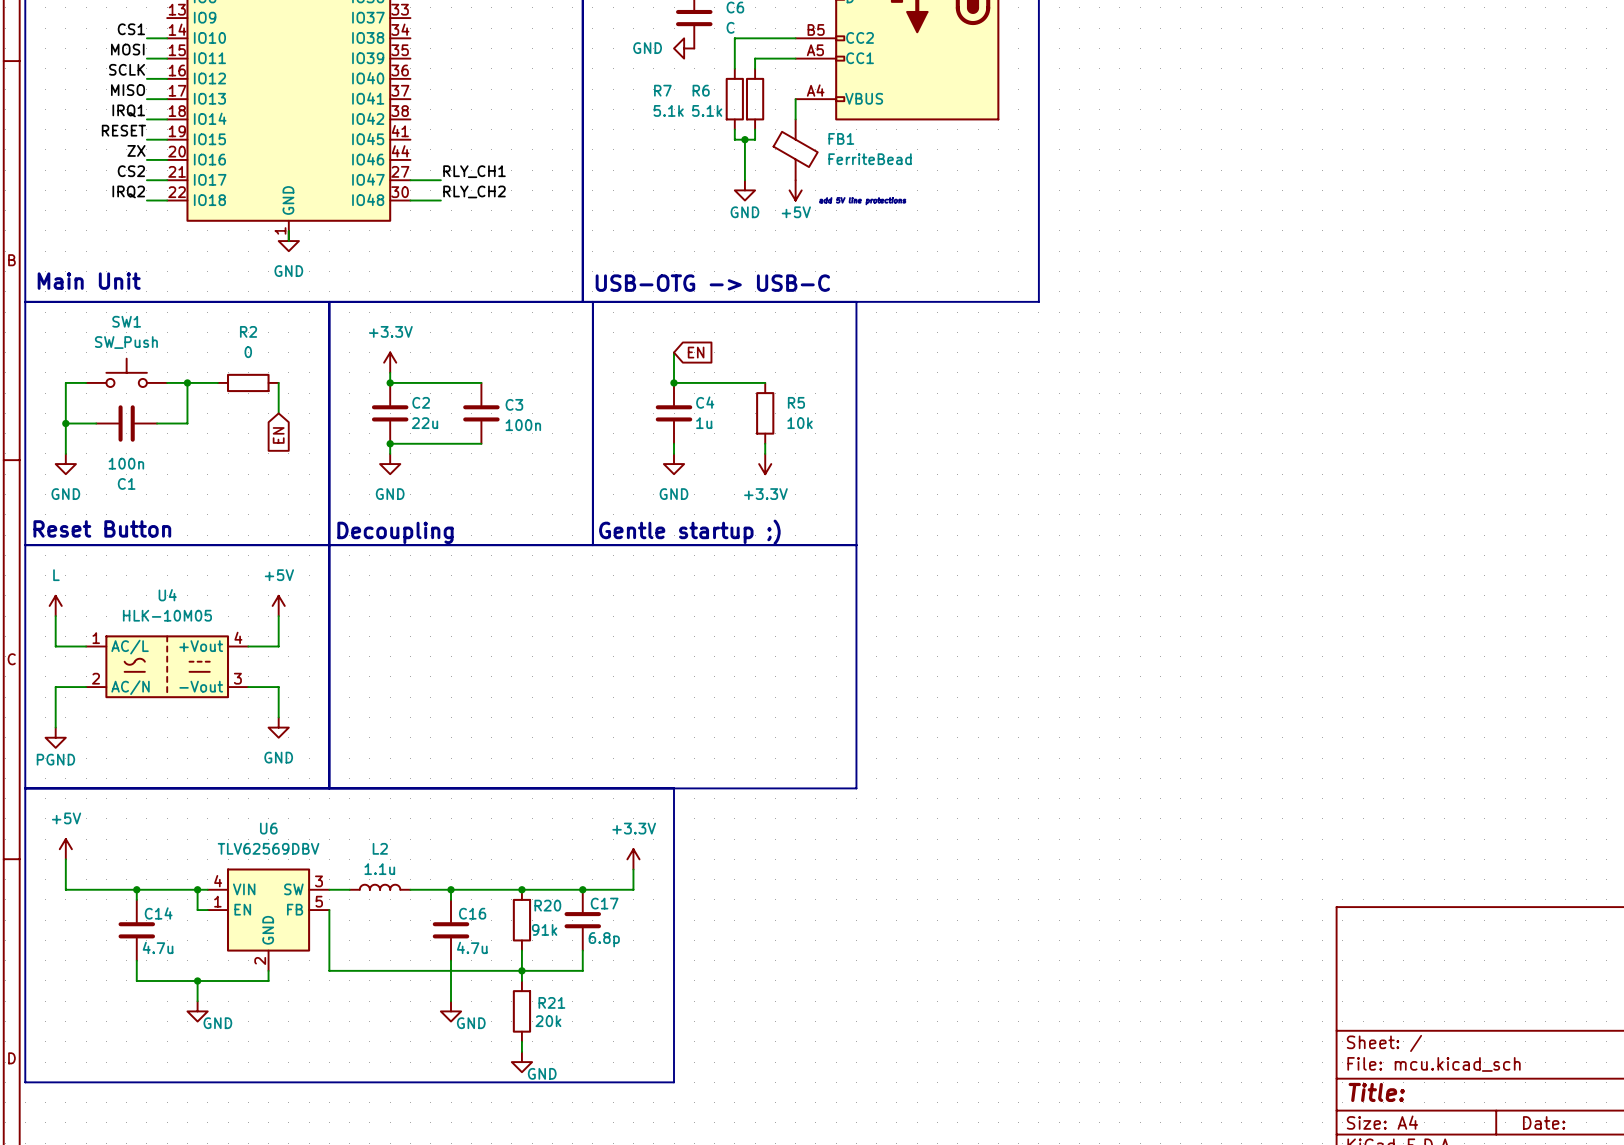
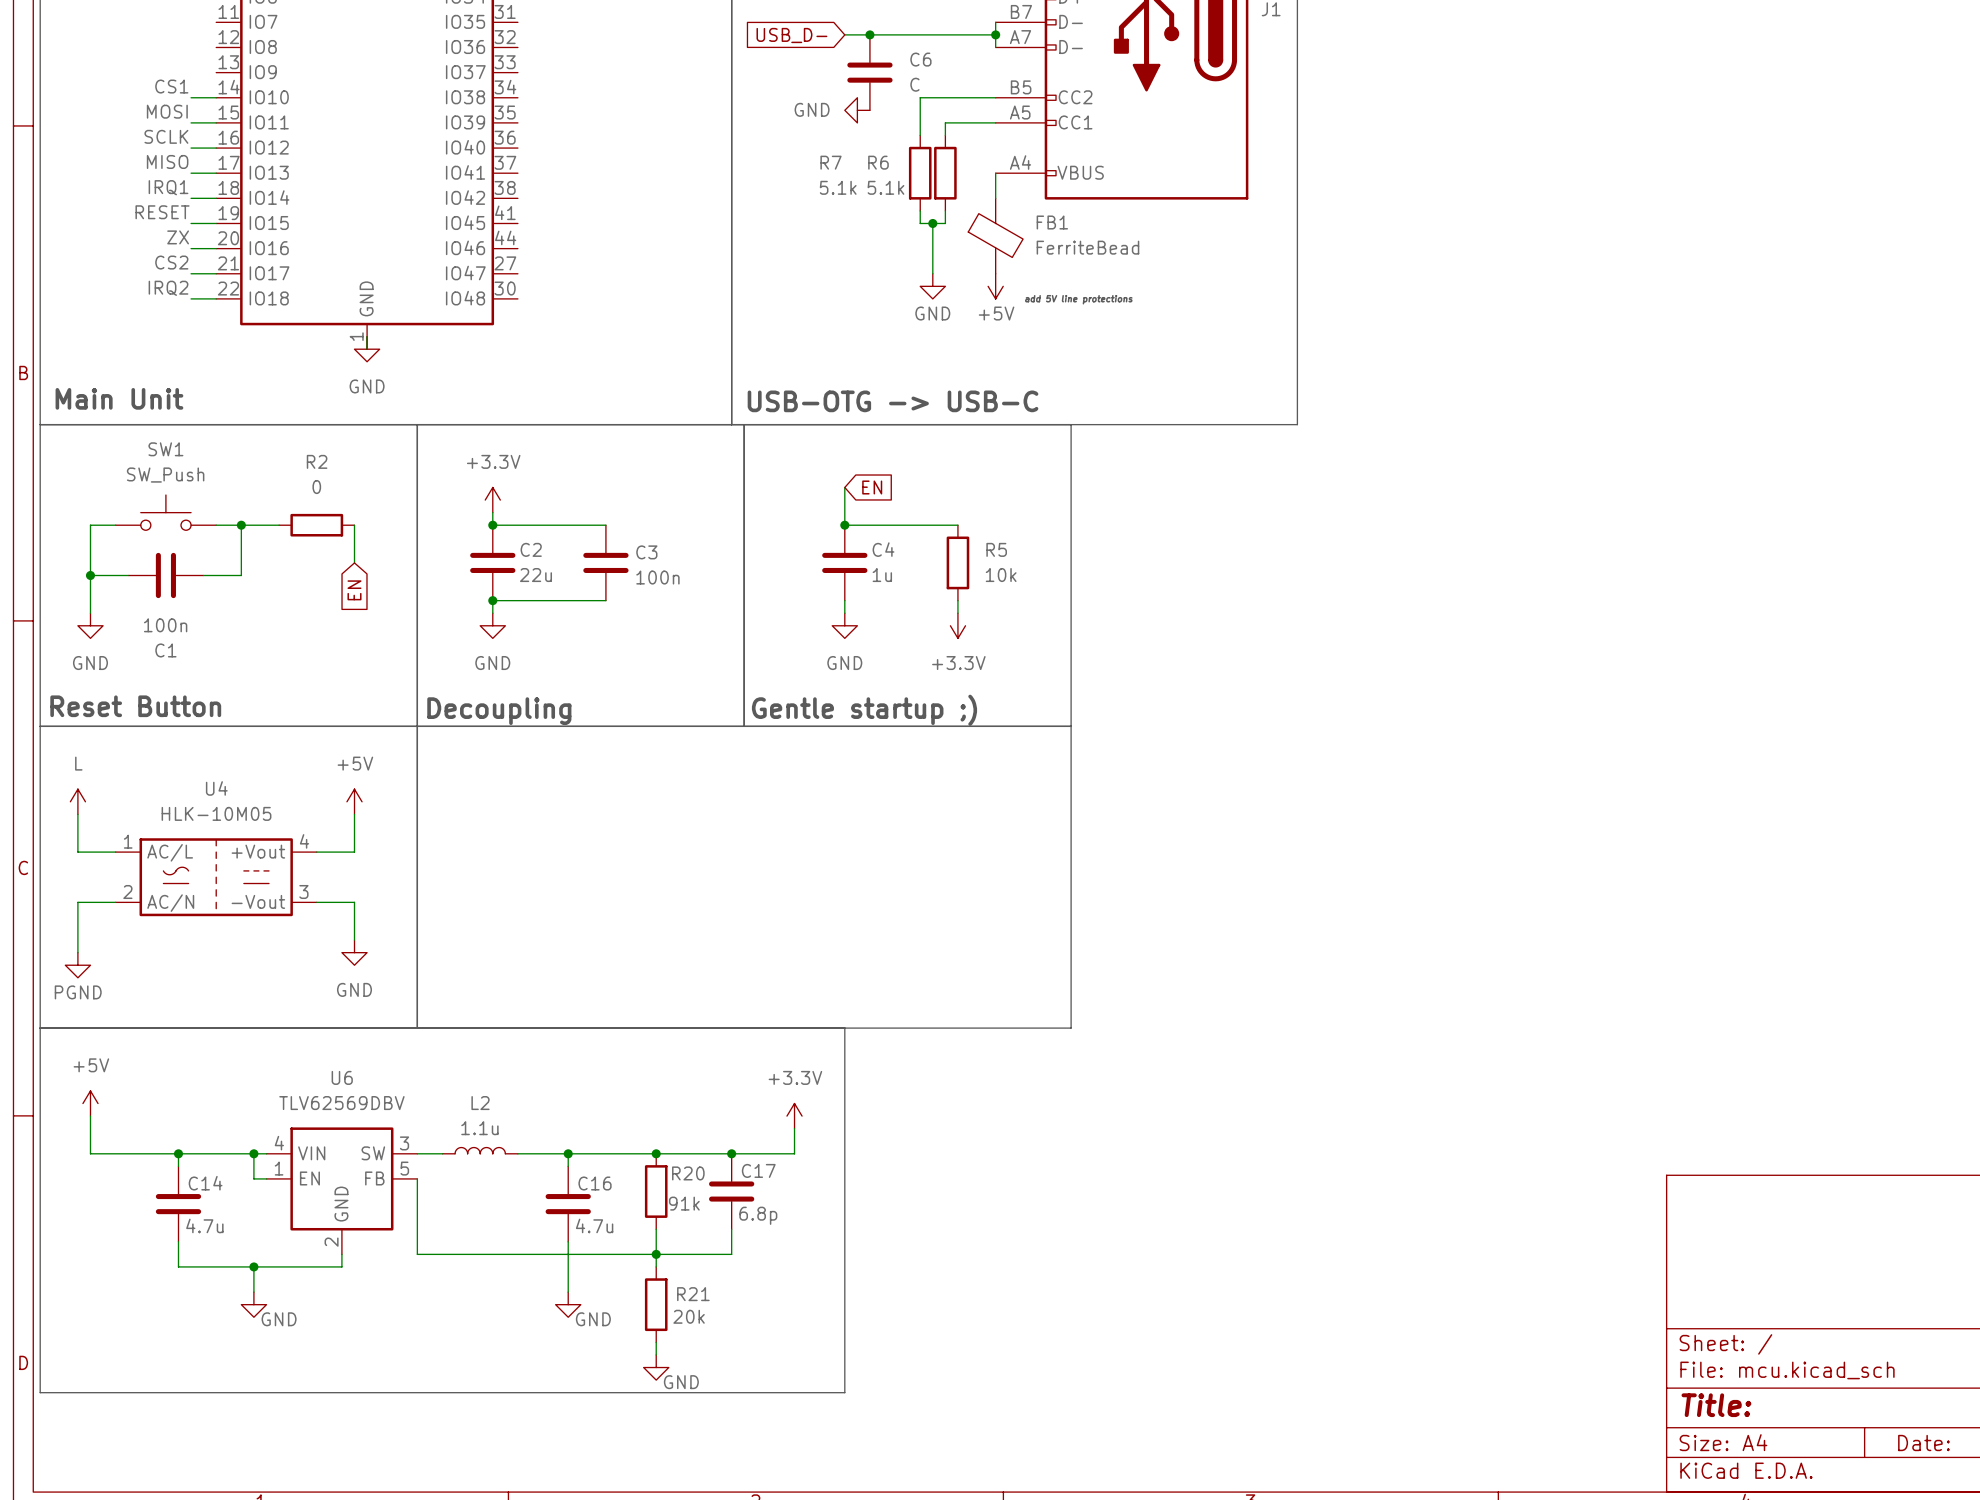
label: RLY_CH1 (474, 171) -> none
wire: (410, 180) (440, 180) -> none
label: RLY_CH2 (474, 191) -> none
wire: (410, 200) (440, 200) -> none

